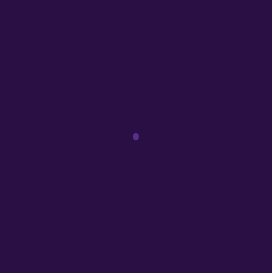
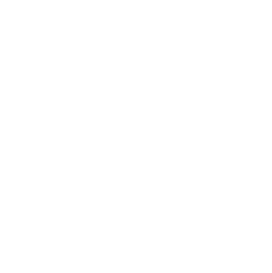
track: (135, 135) (135, 137) -> none

